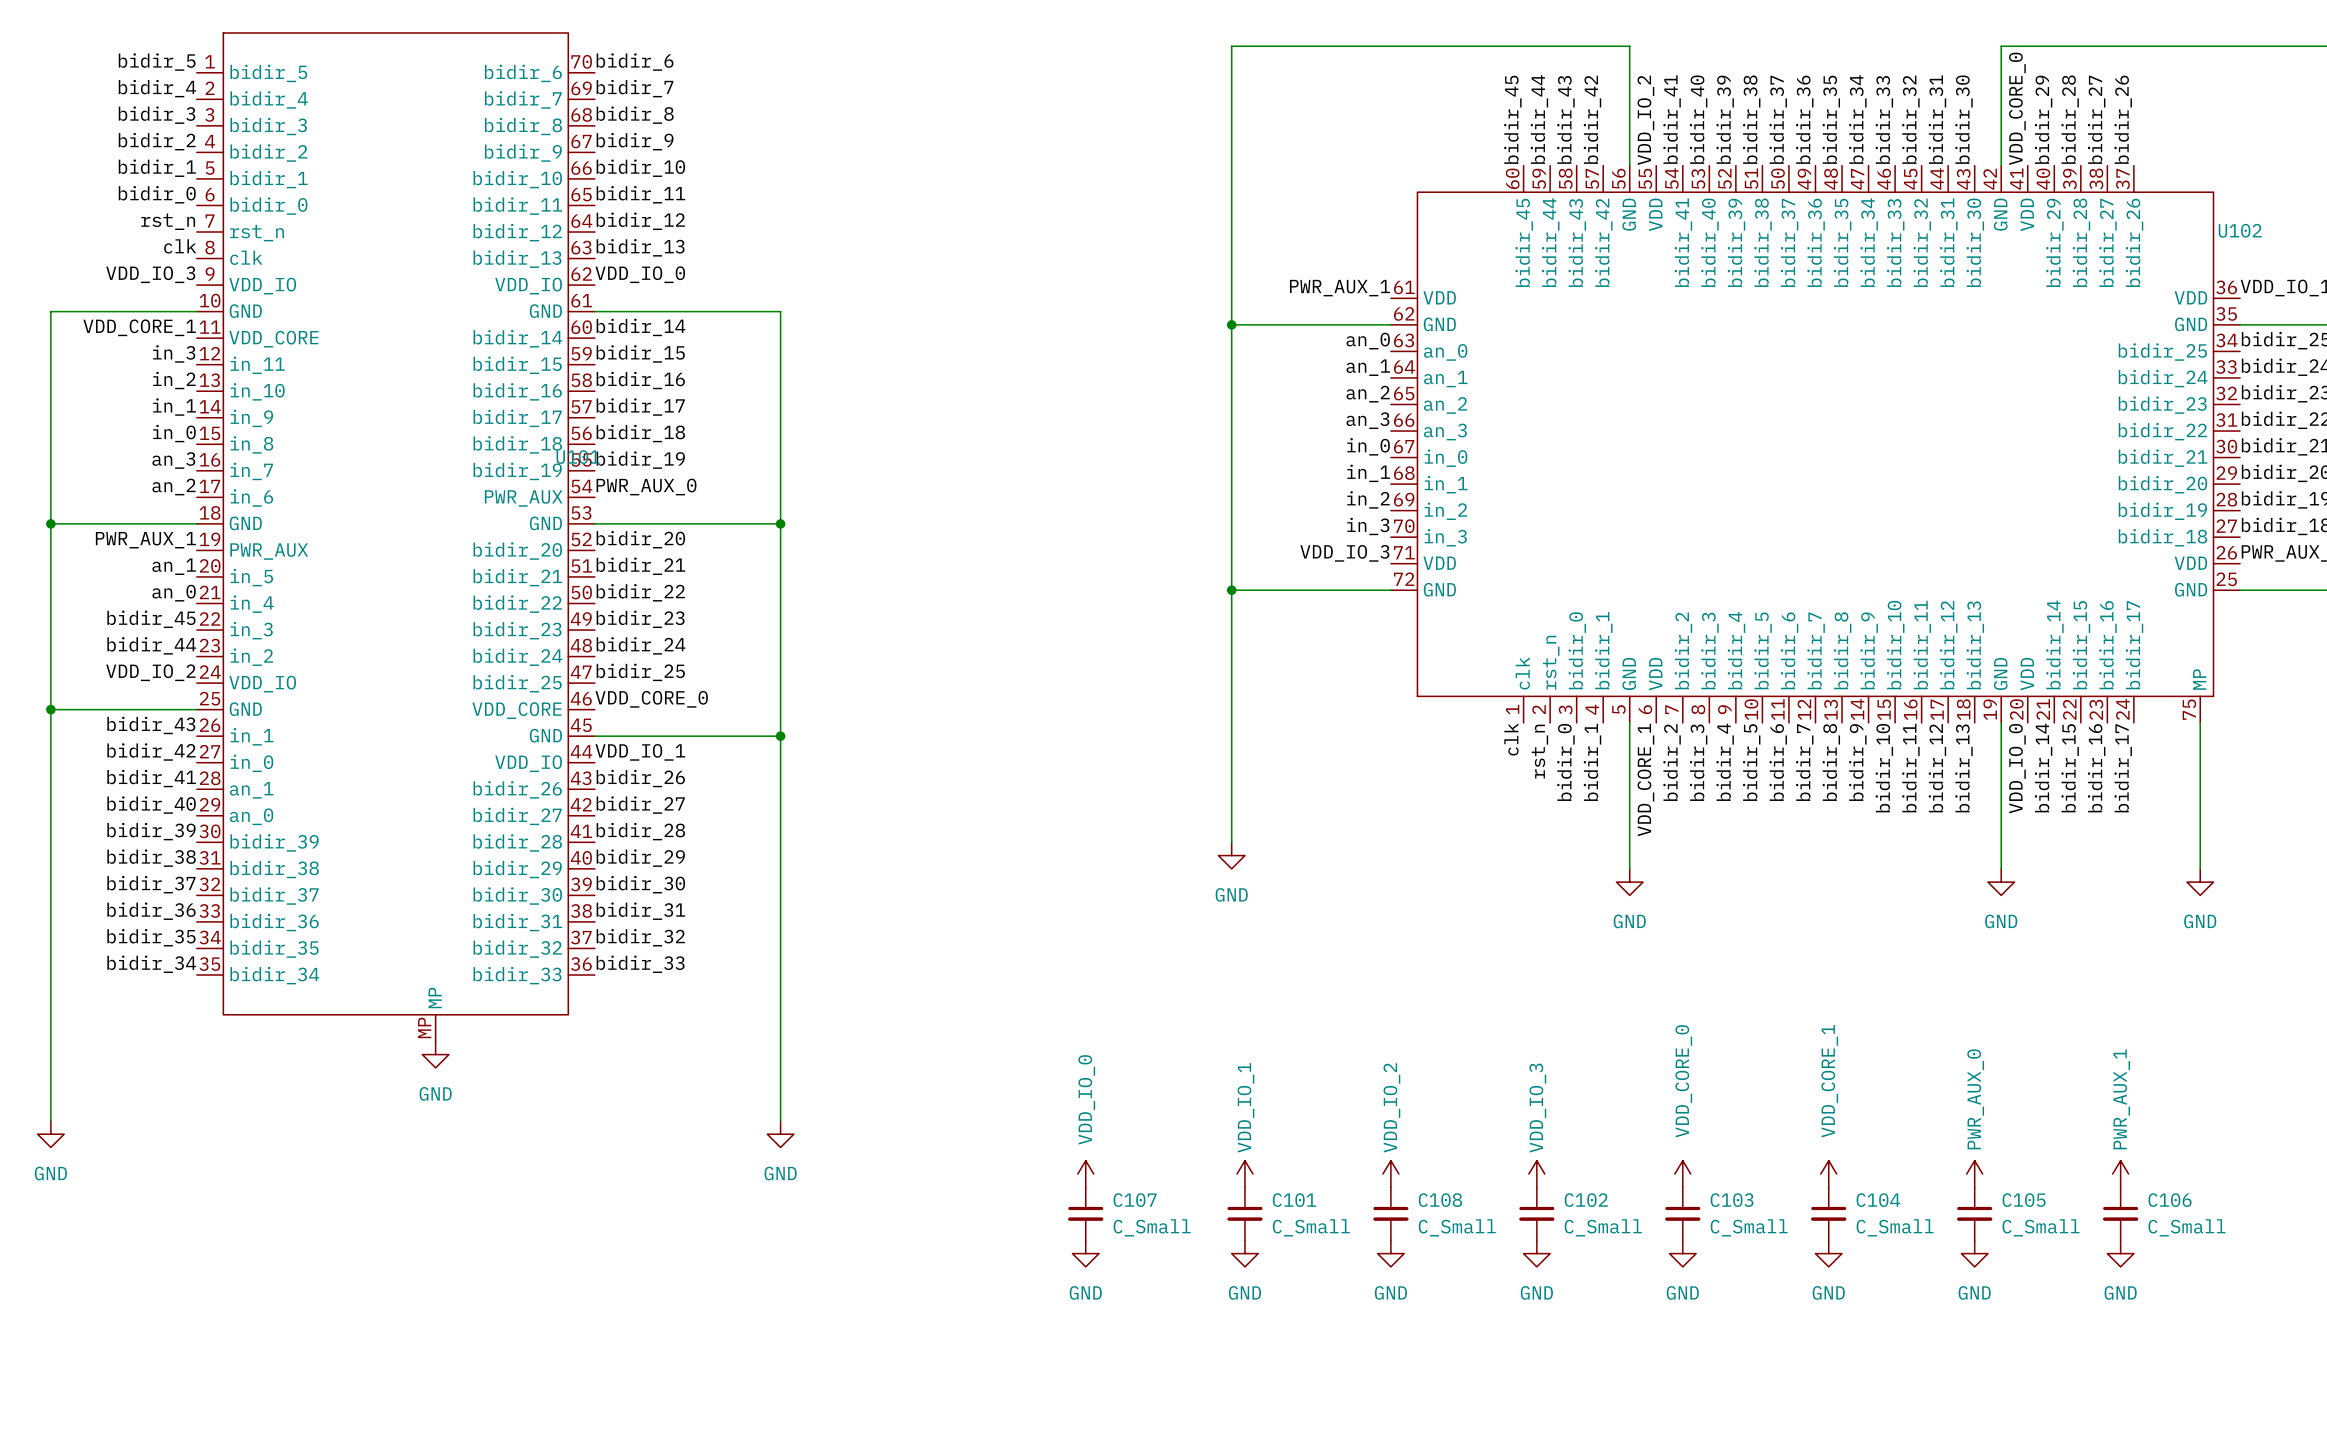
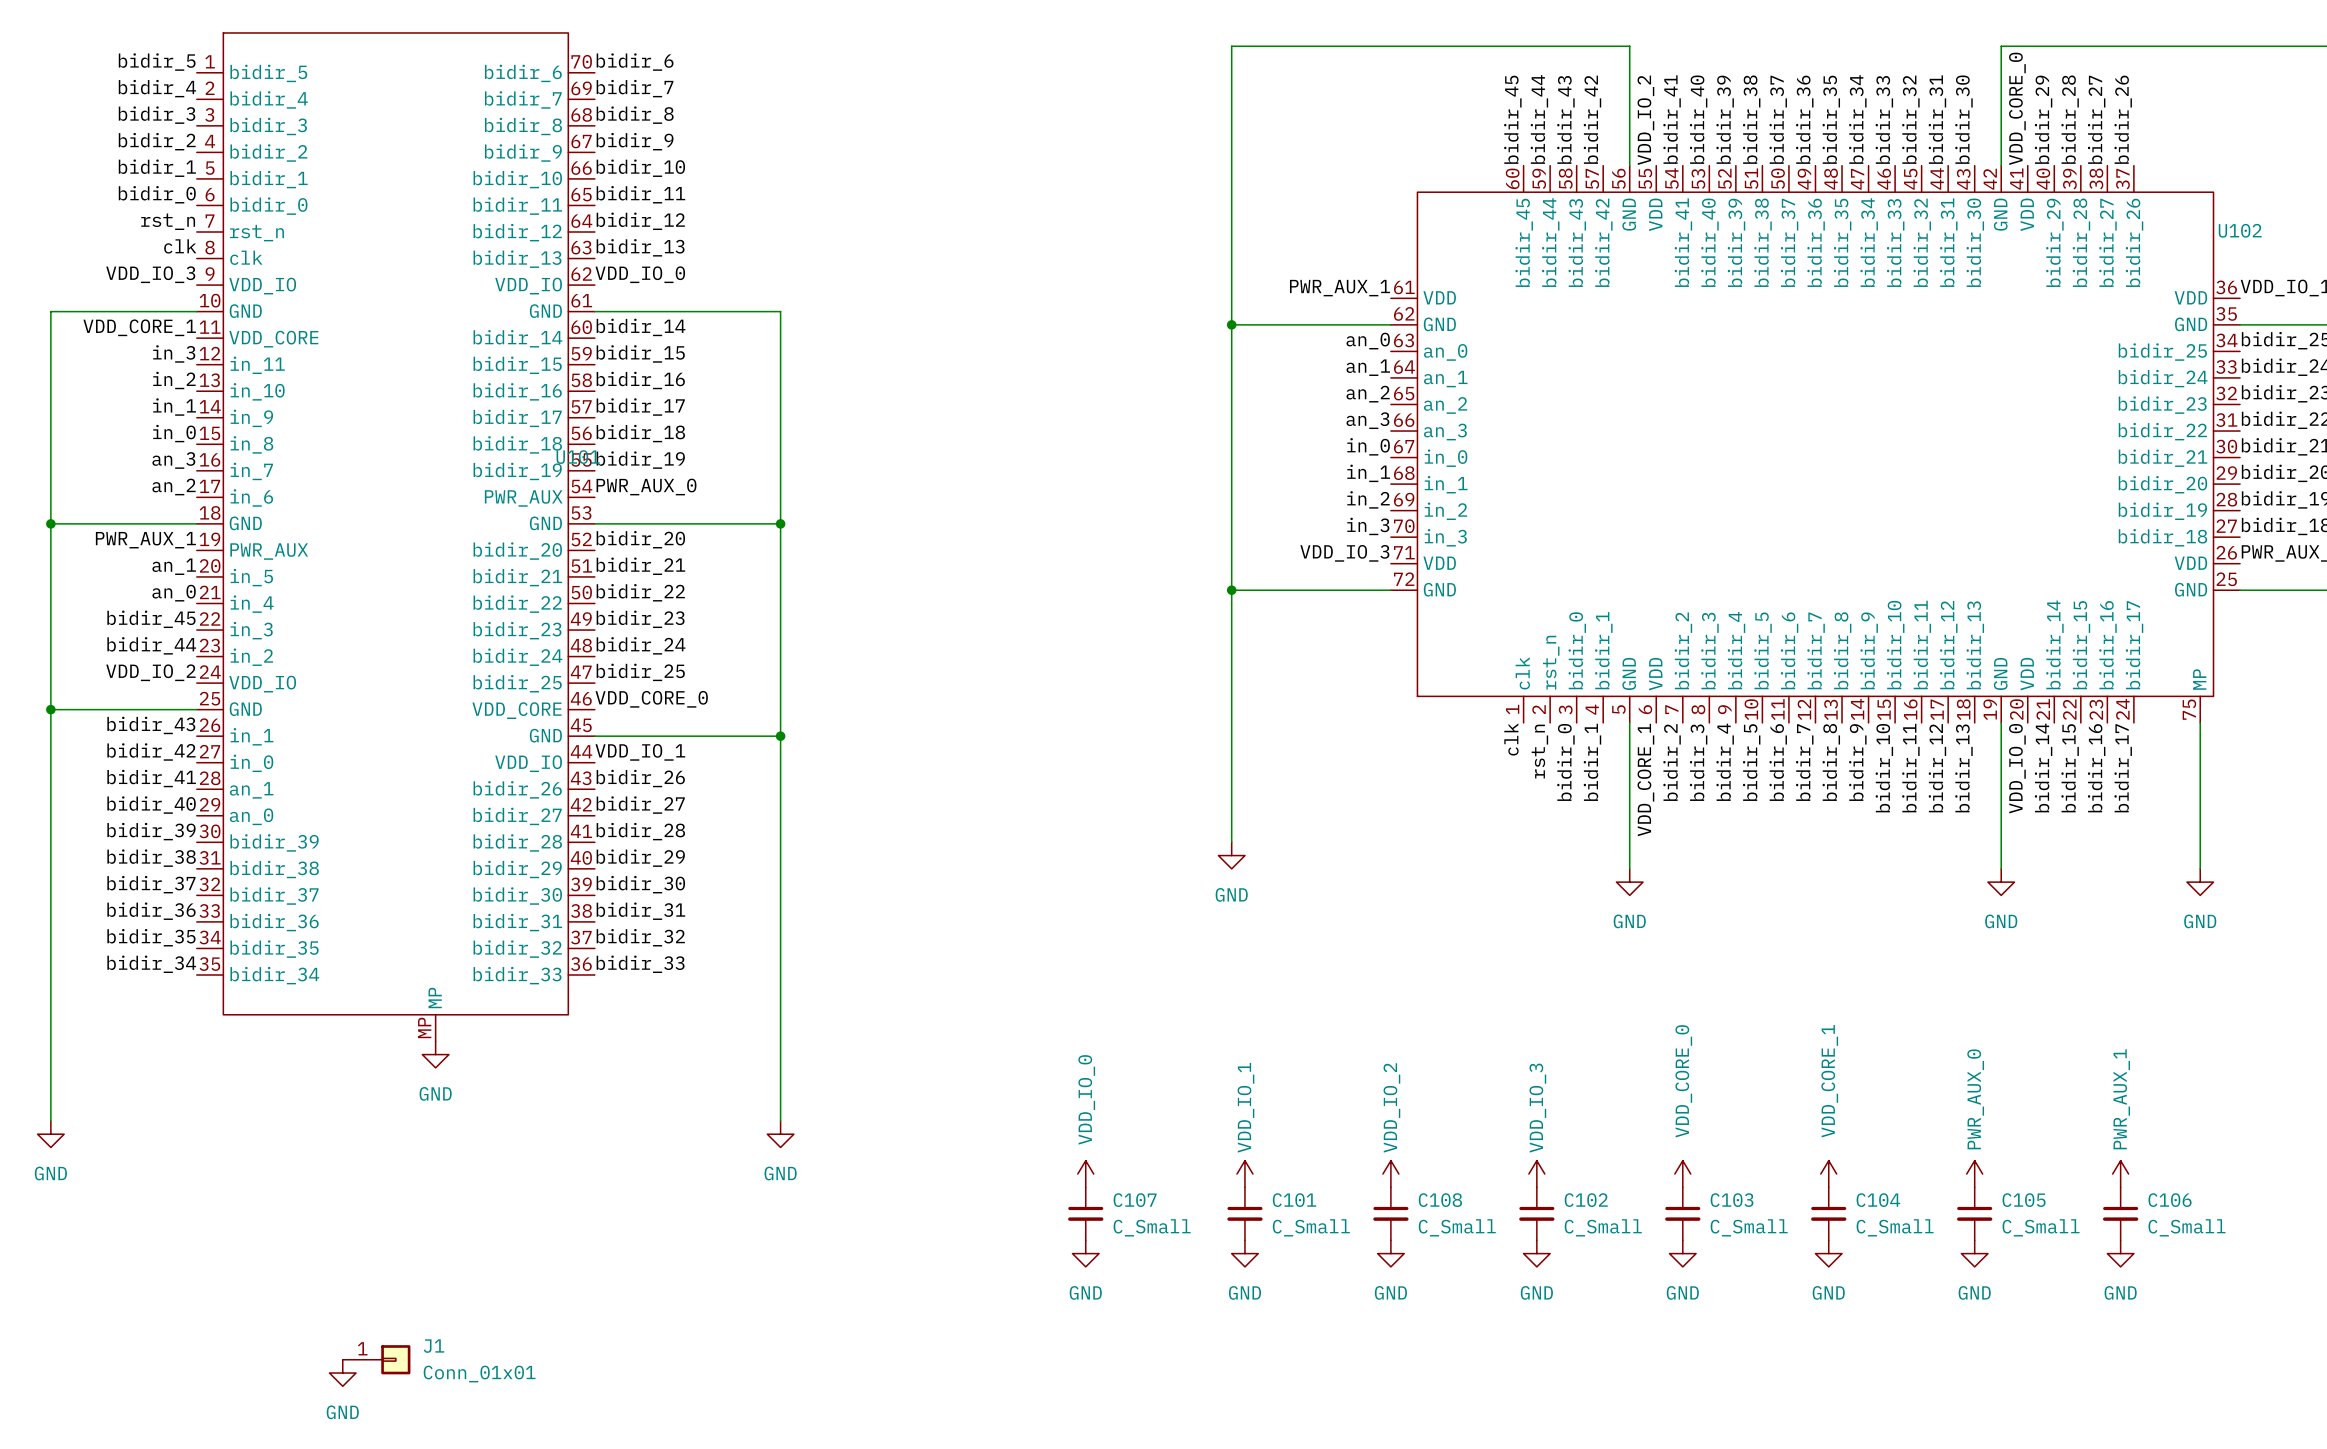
J1: none -> Conn_01x01 (376, 1359)
power symbol: none -> GND (342, 1373)

